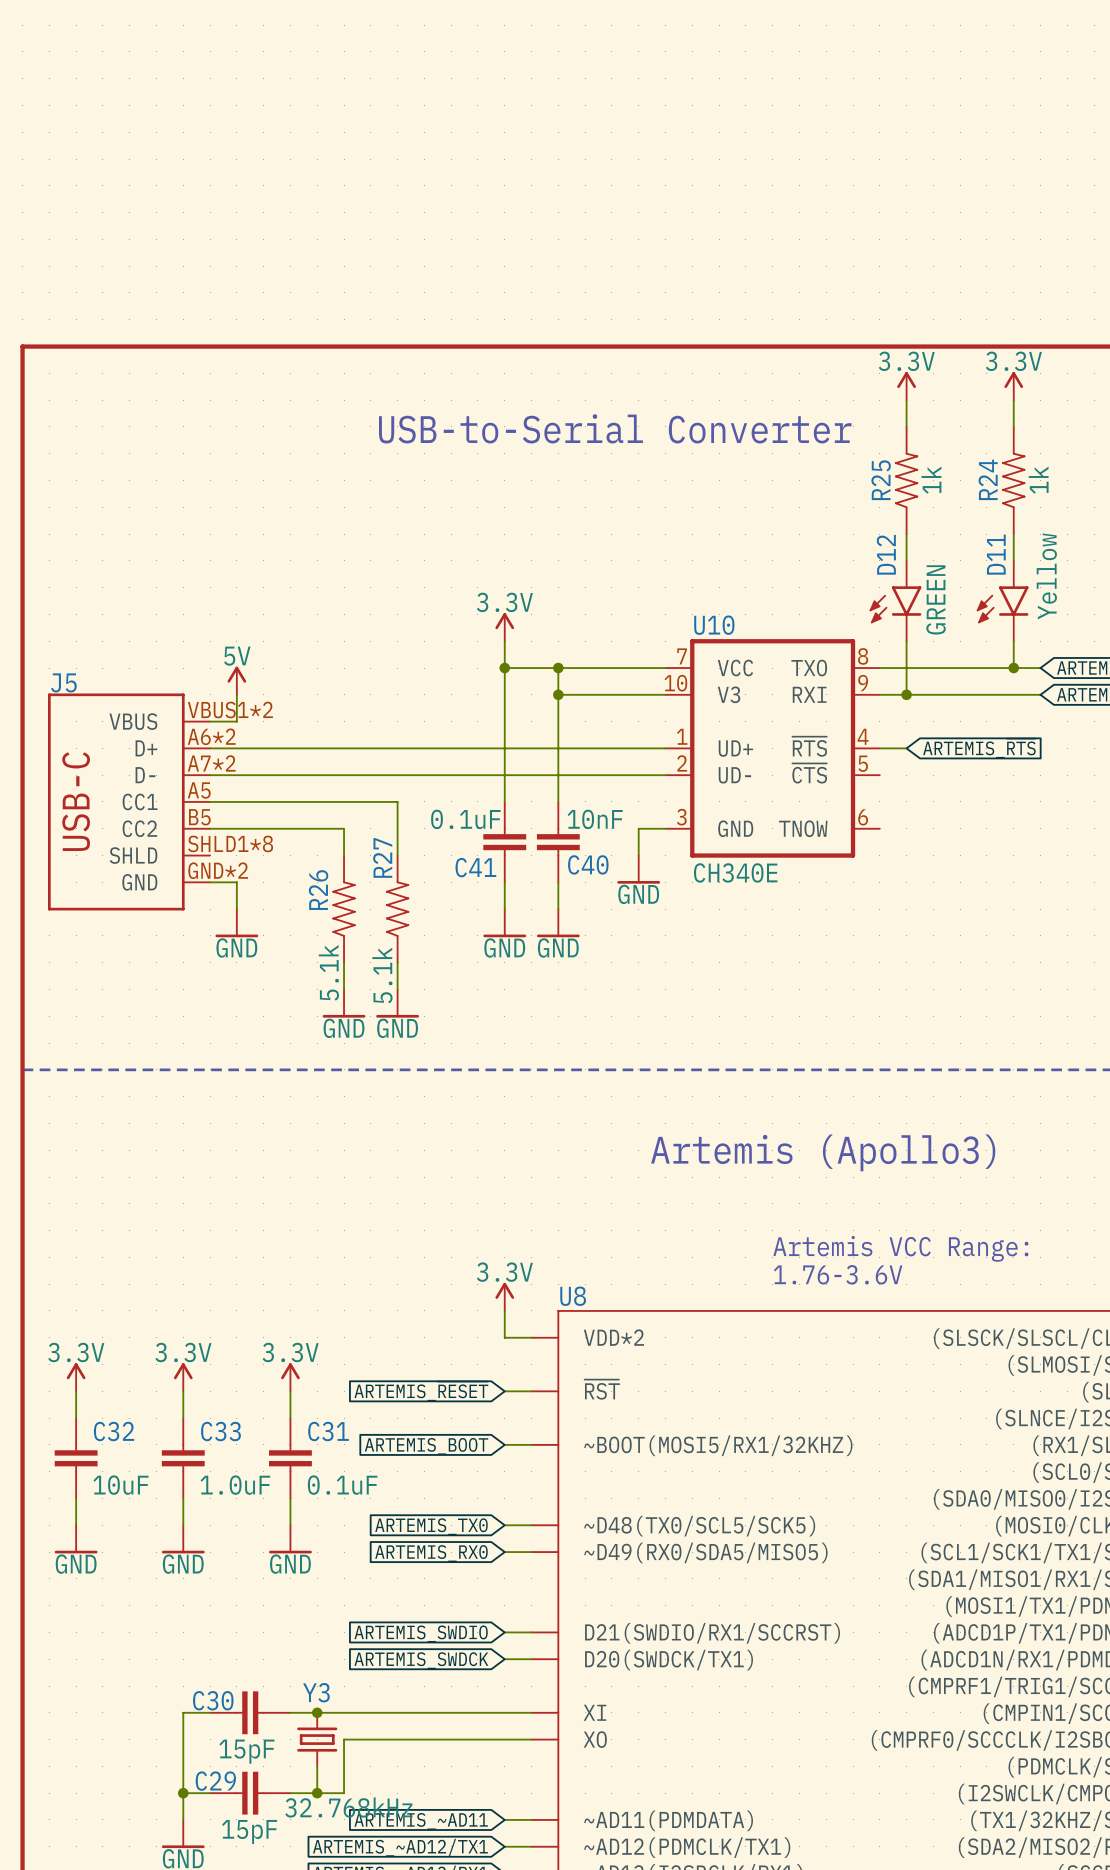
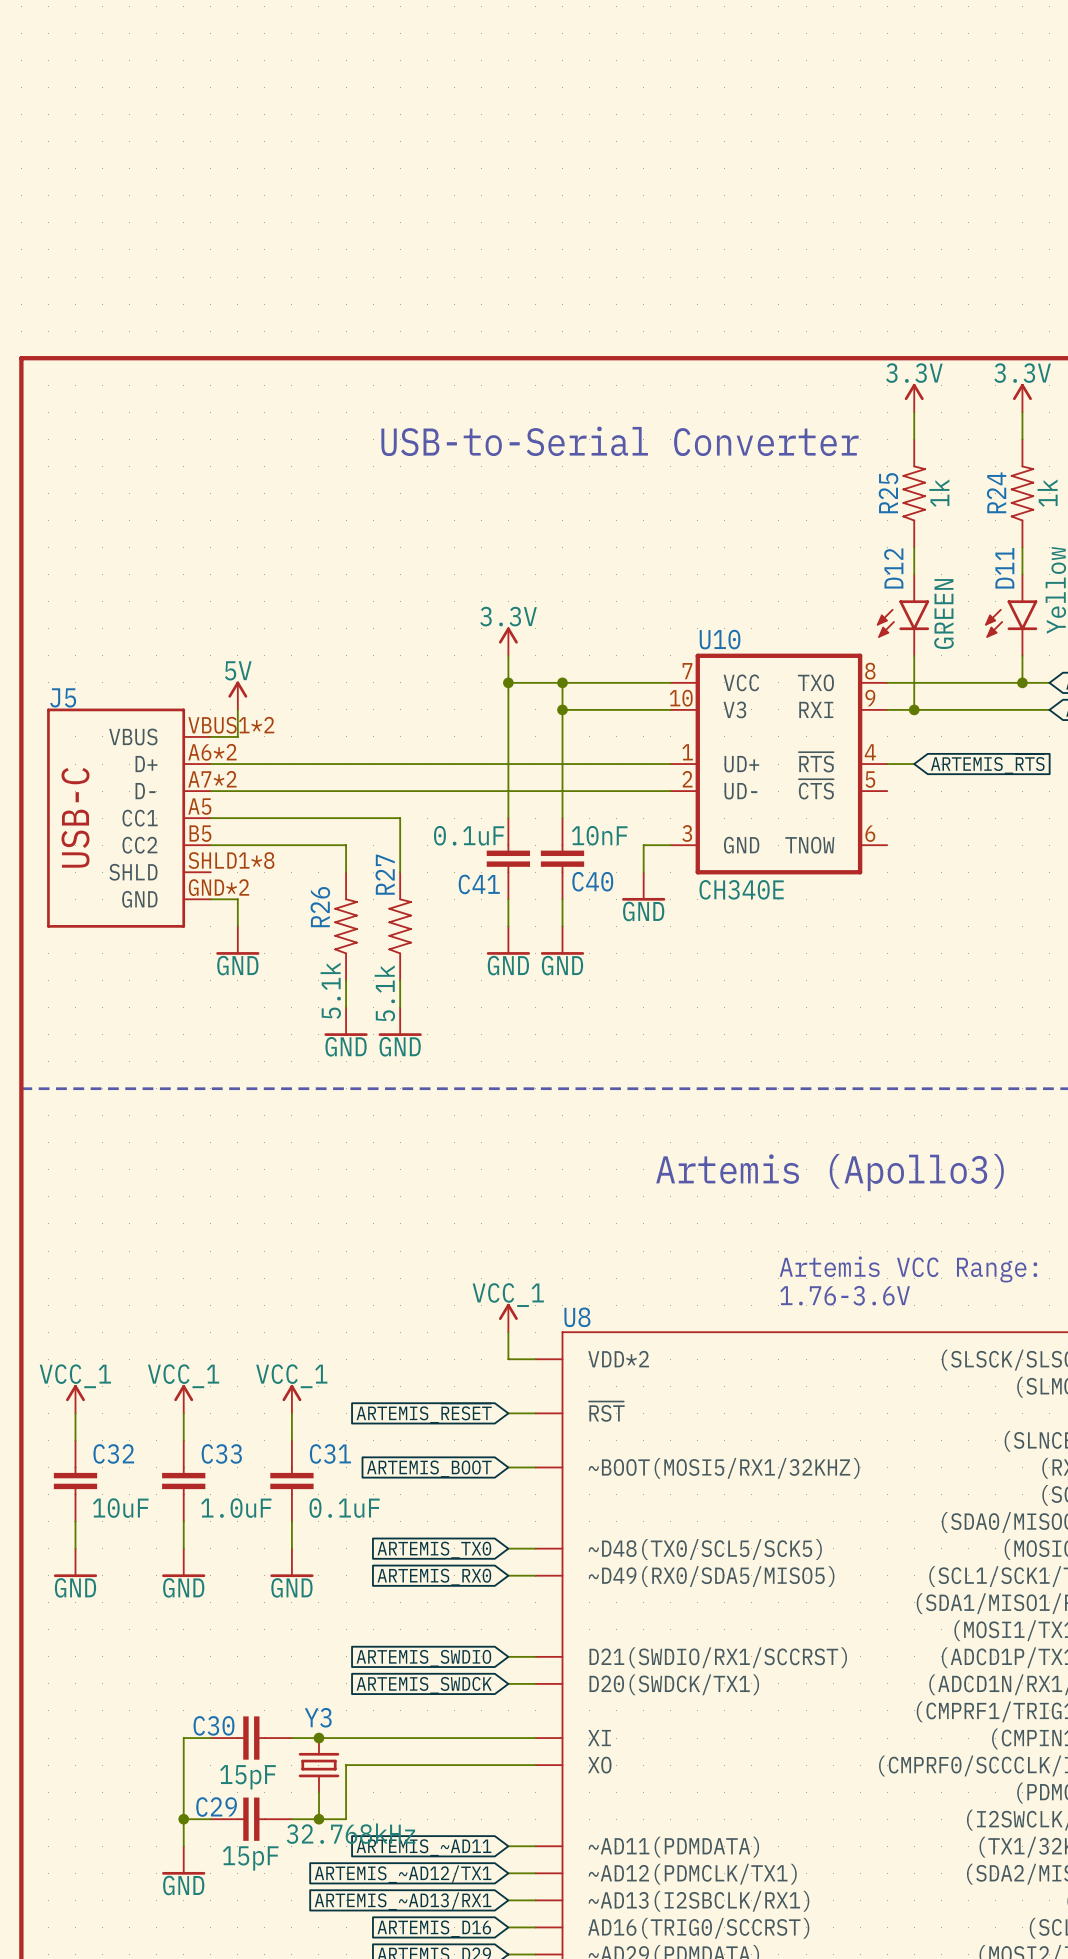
power symbol: 3.3V (504, 1296) -> VCC_1 (508, 1318)
power symbol: 3.3V (76, 1377) -> VCC_1 (75, 1399)
power symbol: 3.3V (183, 1377) -> VCC_1 (183, 1399)
power symbol: 3.3V (290, 1377) -> VCC_1 (291, 1399)

